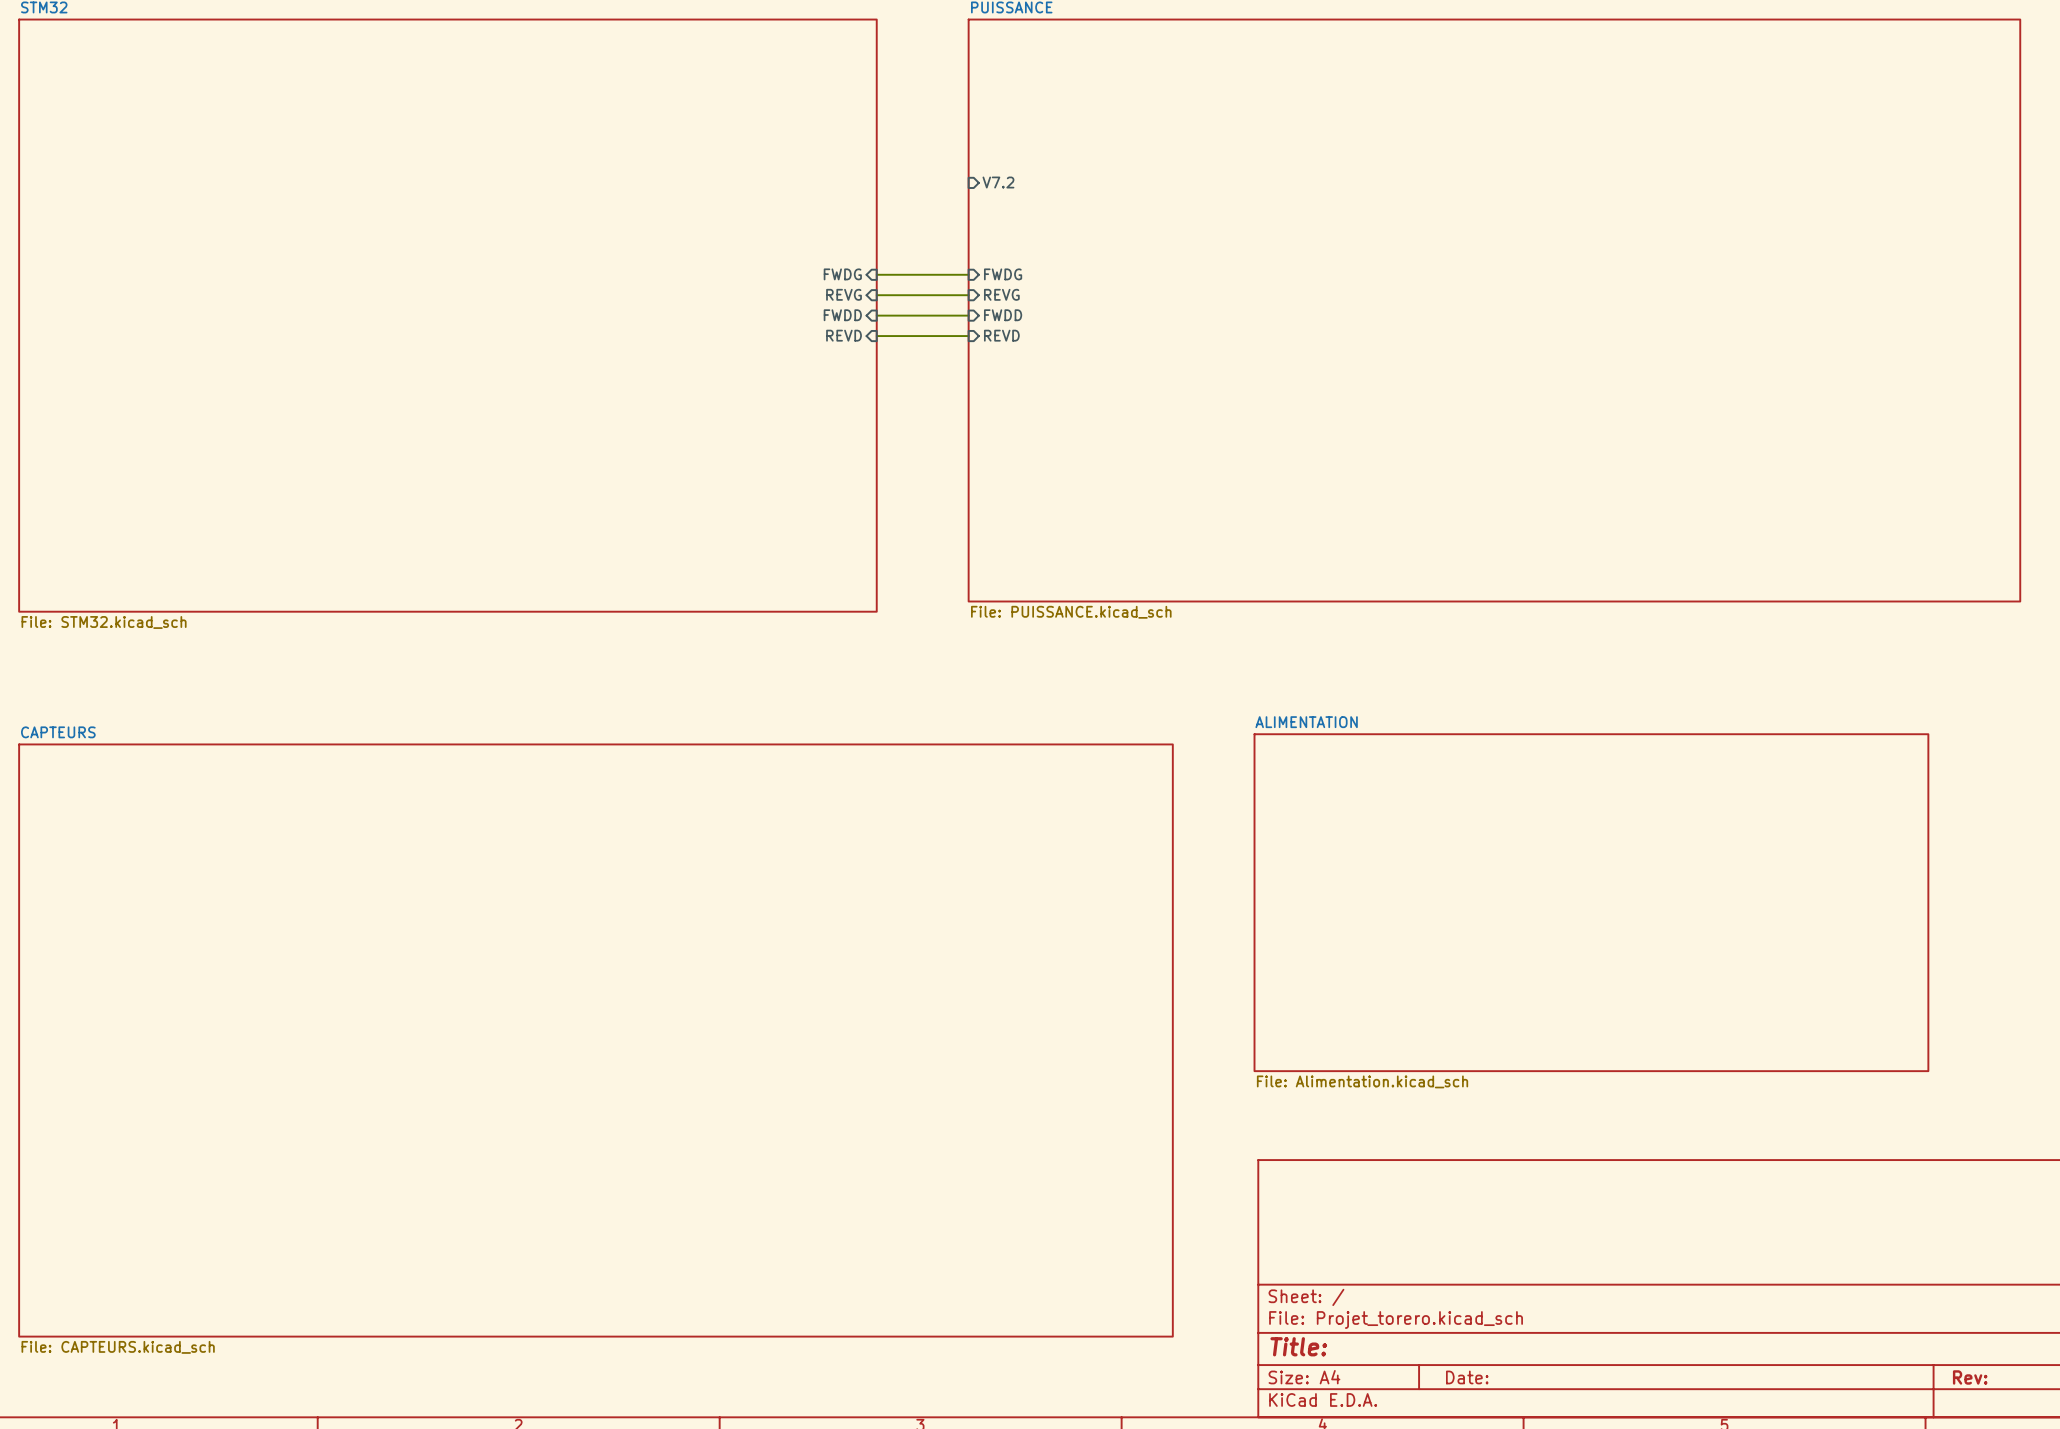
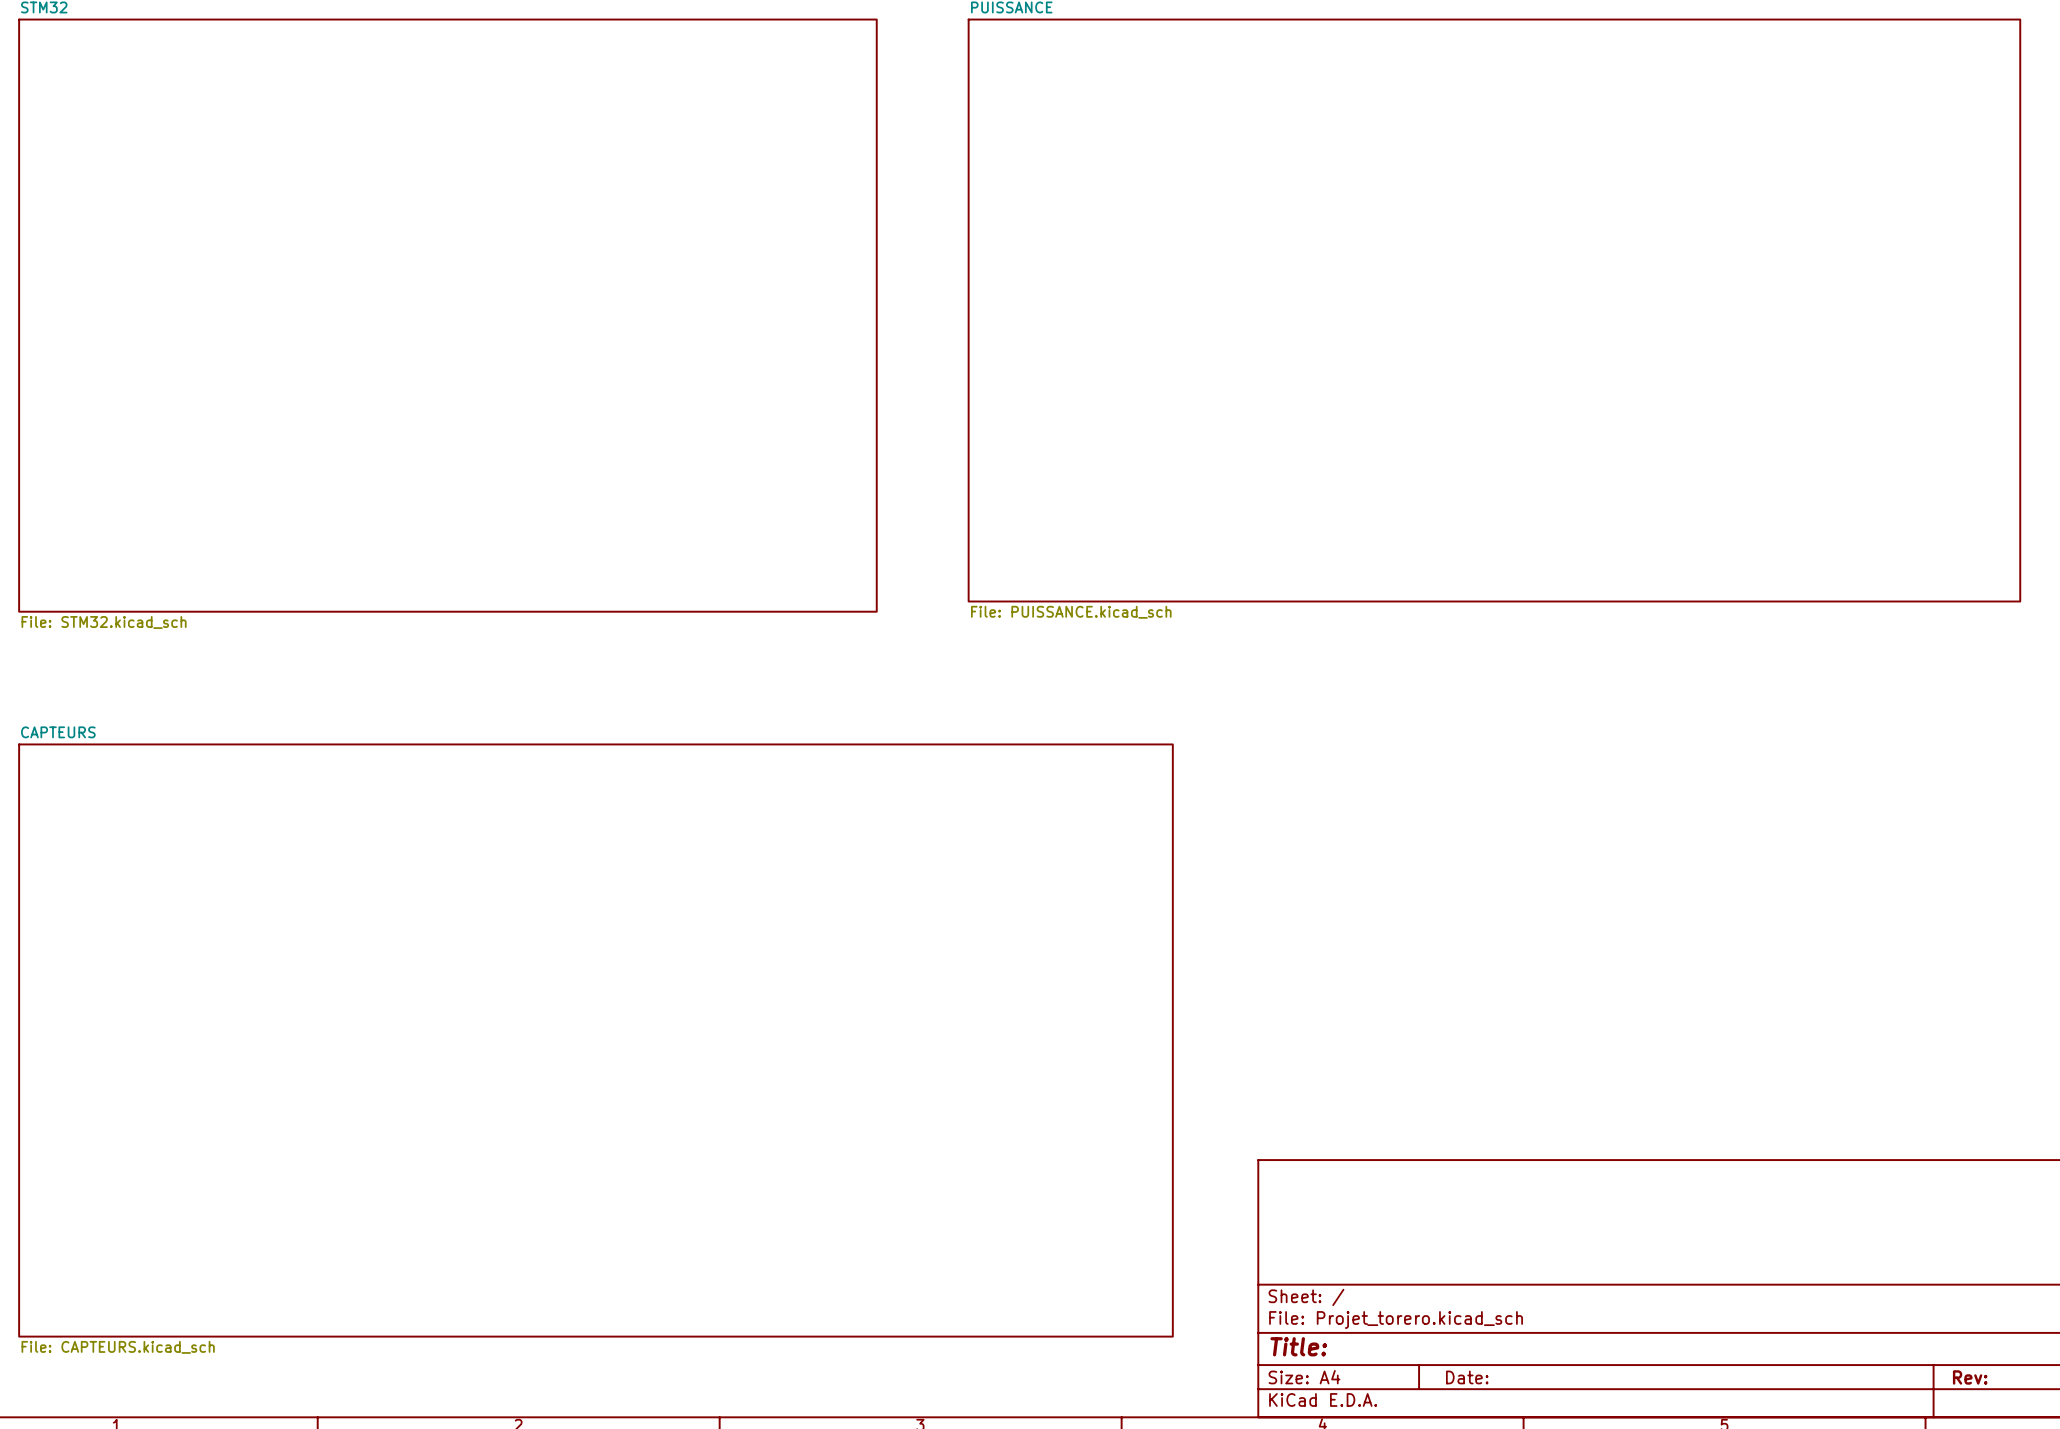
sheet pin: V7.2 (998, 182) -> none
sheet pin: FWDG (842, 274) -> none
wire: (876, 274) (968, 274) -> none
sheet pin: FWDG (1003, 274) -> none
sheet pin: REVG (844, 294) -> none
sheet pin: REVG (1001, 294) -> none
wire: (876, 295) (968, 295) -> none
sheet pin: FWDD (842, 315) -> none
wire: (876, 315) (968, 315) -> none
sheet pin: FWDD (1003, 315) -> none
sheet pin: REVD (844, 335) -> none
sheet pin: REVD (1001, 335) -> none
wire: (876, 336) (968, 336) -> none
sheet ALIMENTATION: File: Alimentation.kicad_sch (1591, 902) -> none

